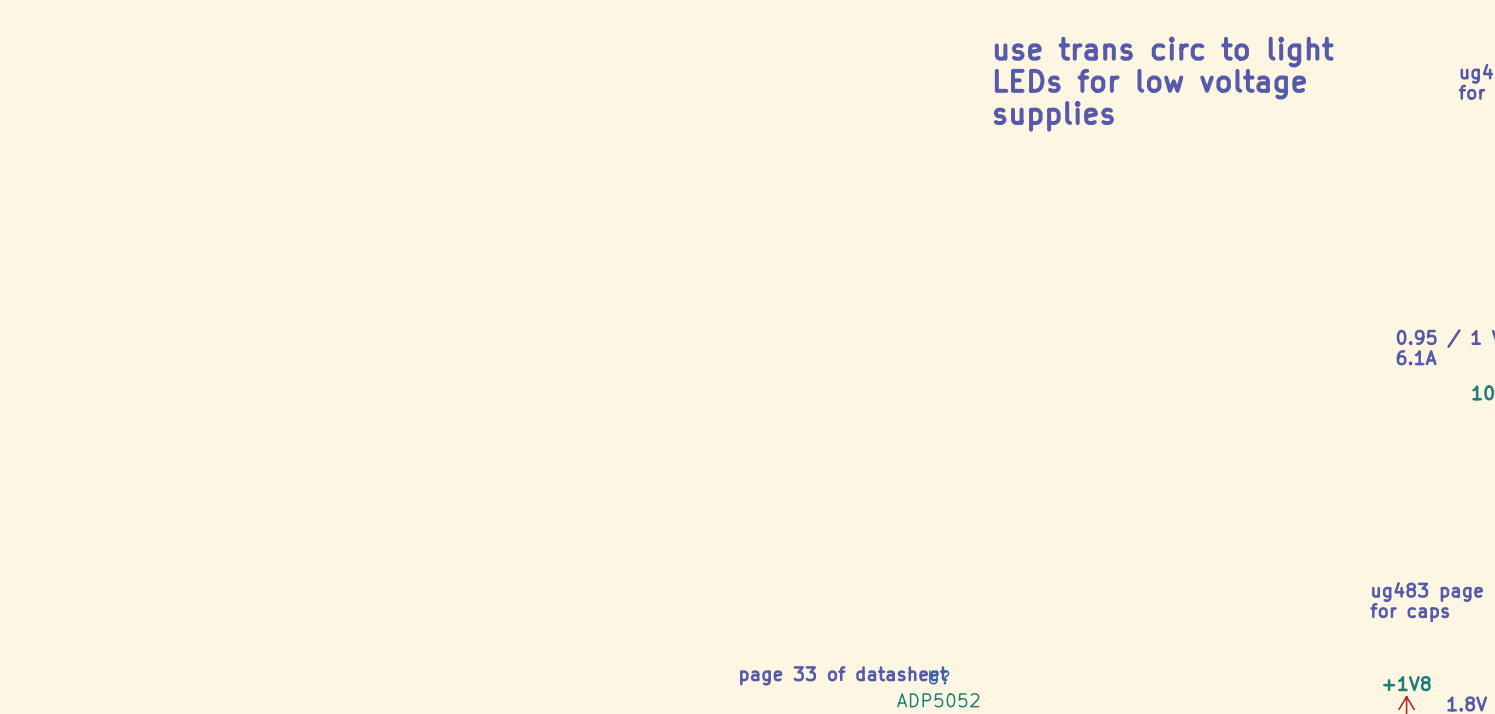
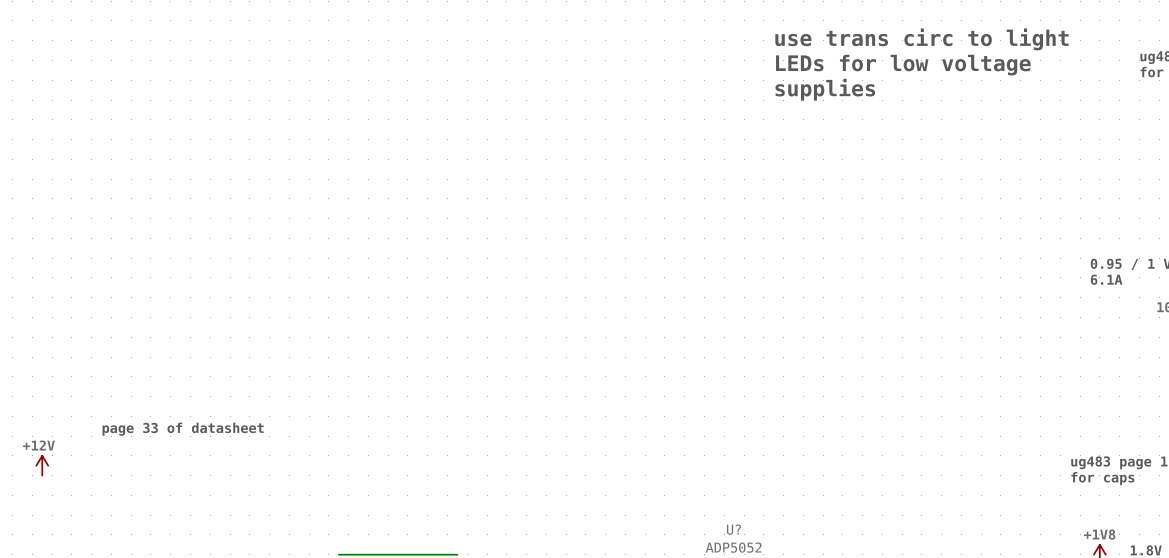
text: none -> page 33 of datasheet (183, 429)
power symbol: none -> +12V (42, 465)
text: page 33 of datasheet (843, 675) -> none
wire: none -> (338, 554) (457, 554)

